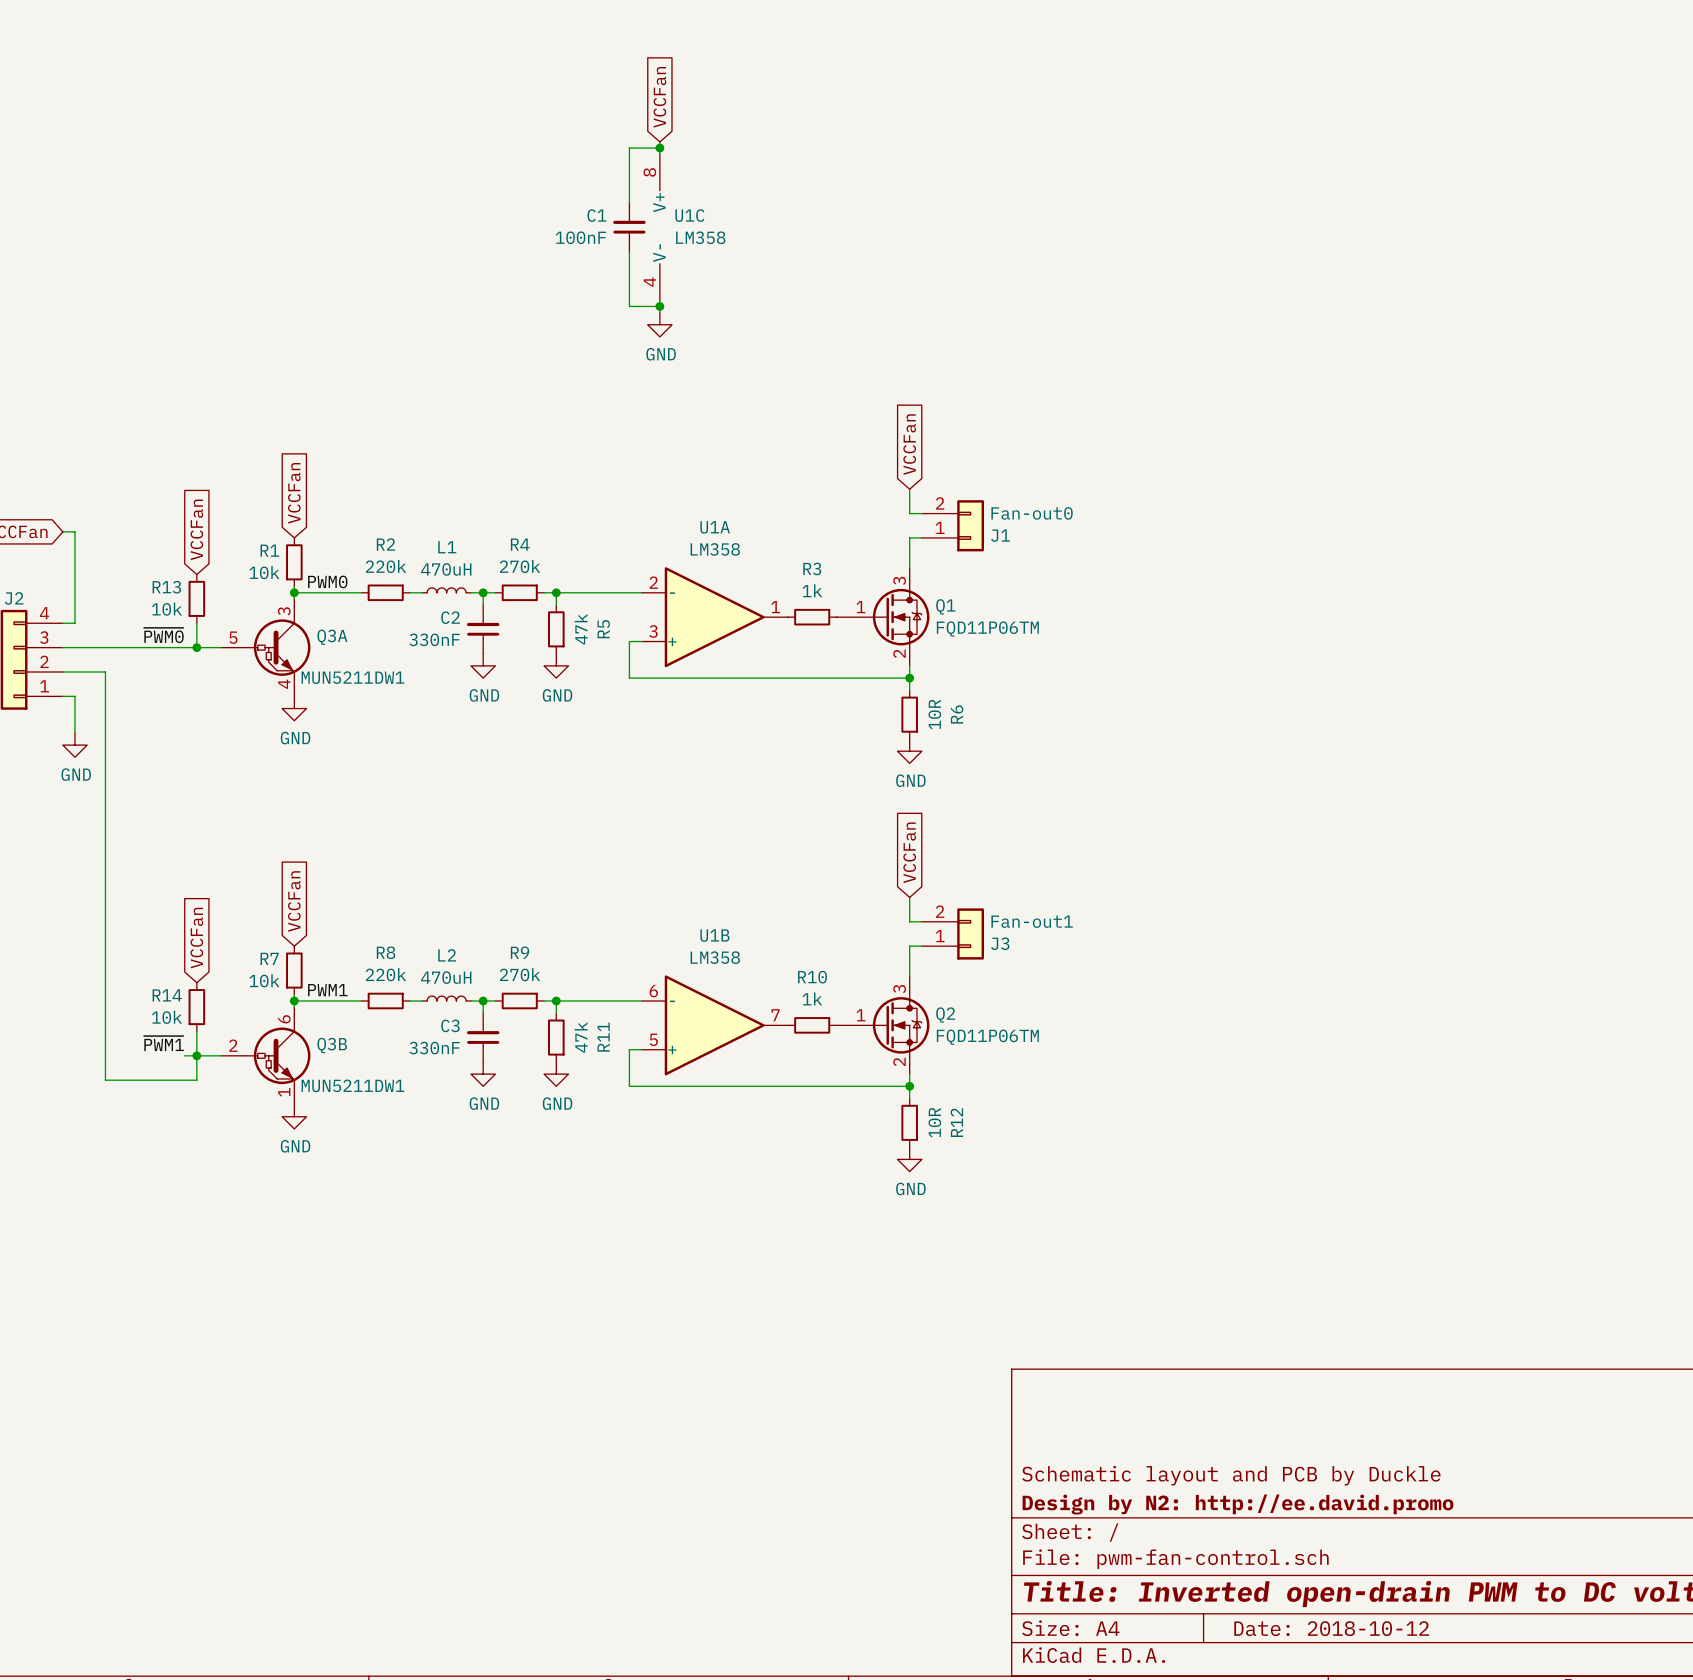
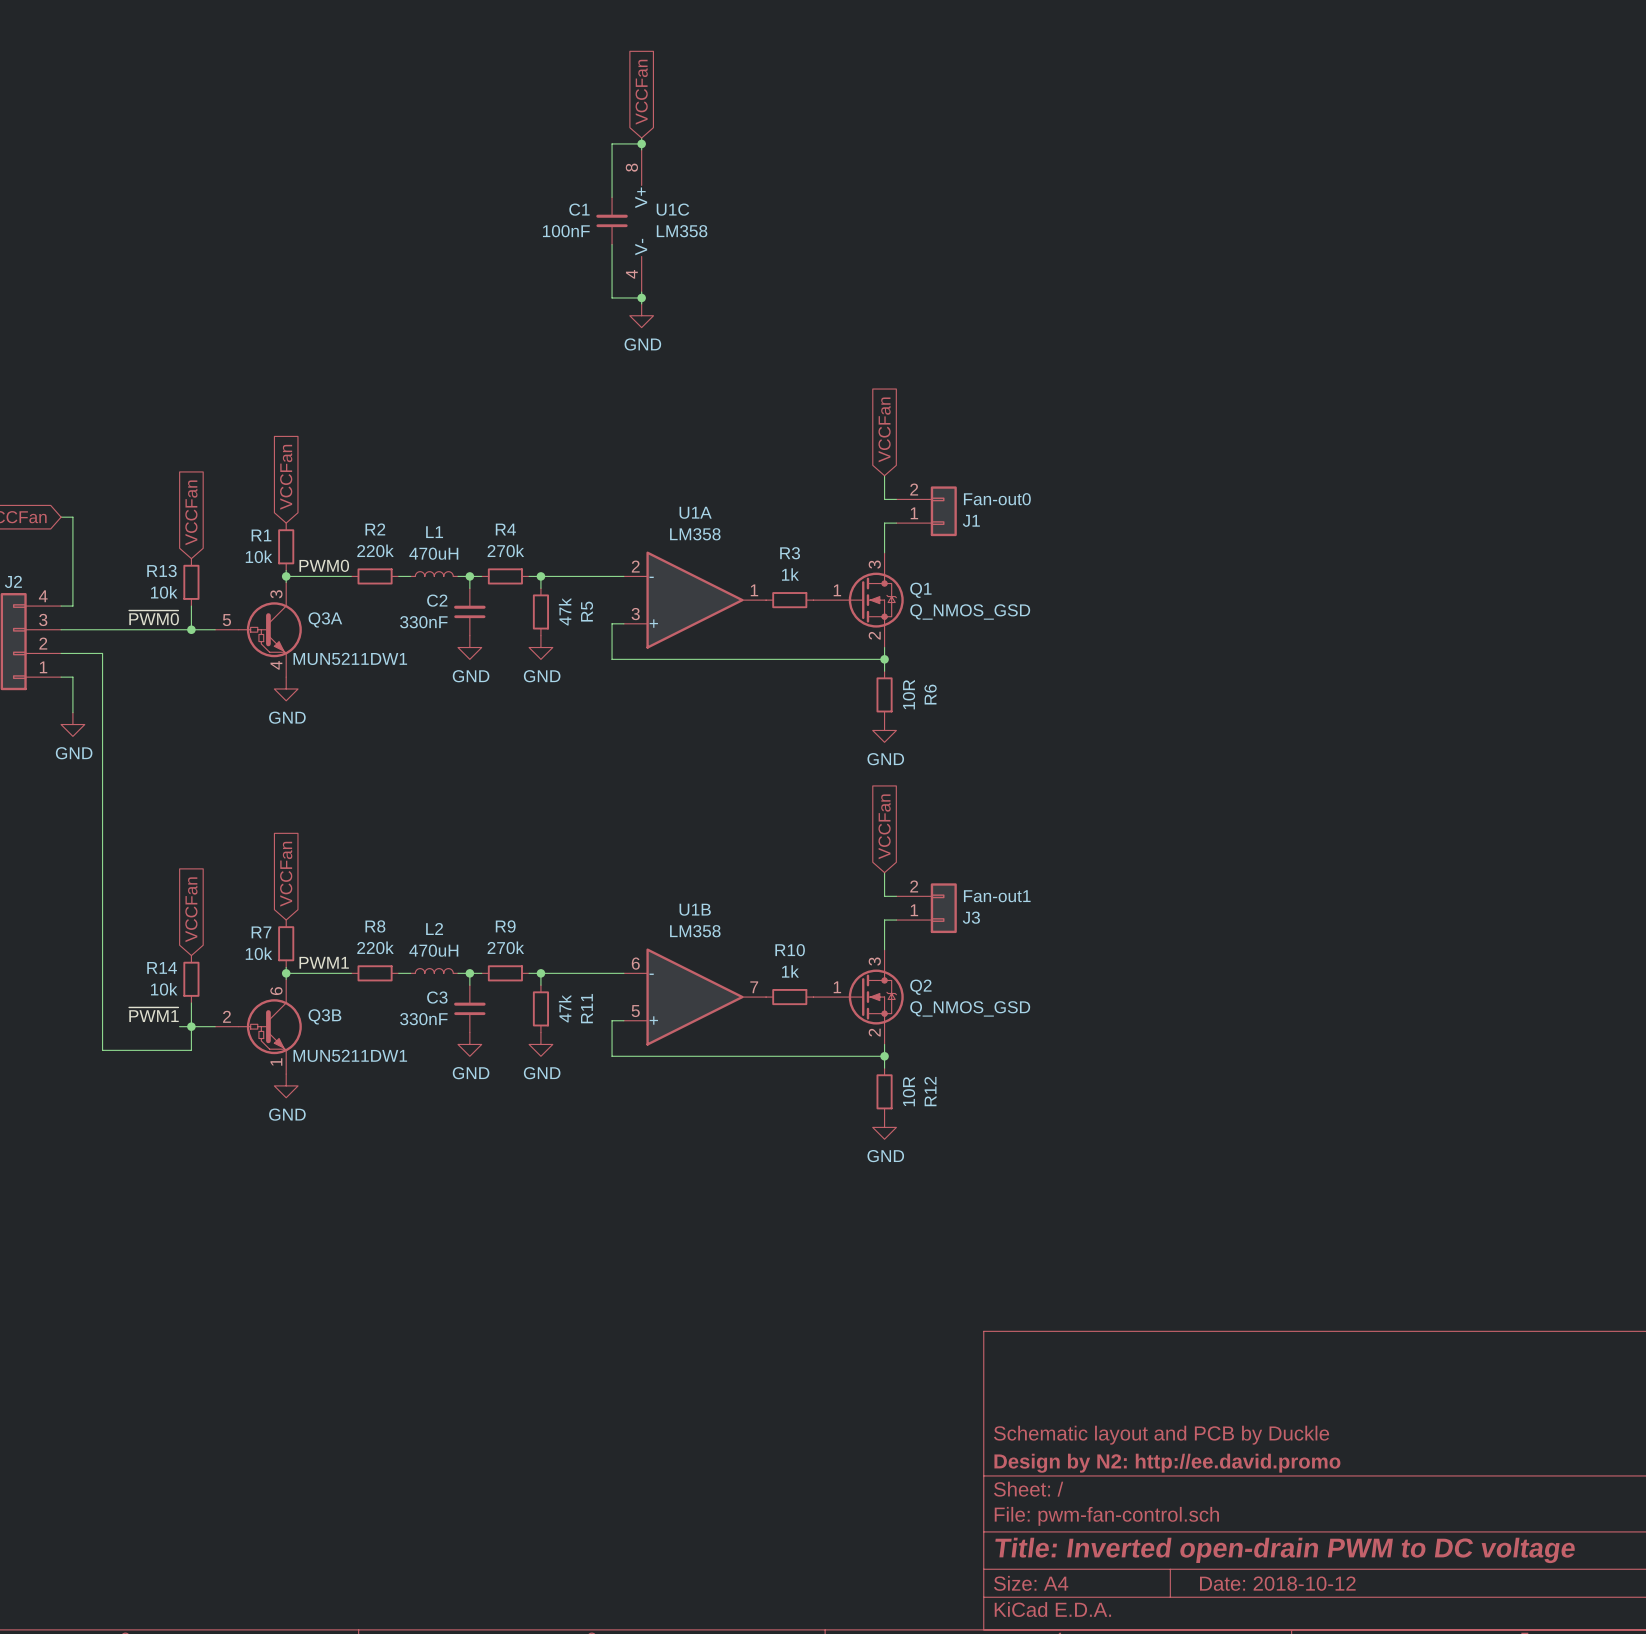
Q1 value: FQD11P06TM (987, 629) -> Q_NMOS_GSD (970, 611)
Q2 value: FQD11P06TM (987, 1037) -> Q_NMOS_GSD (970, 1008)

